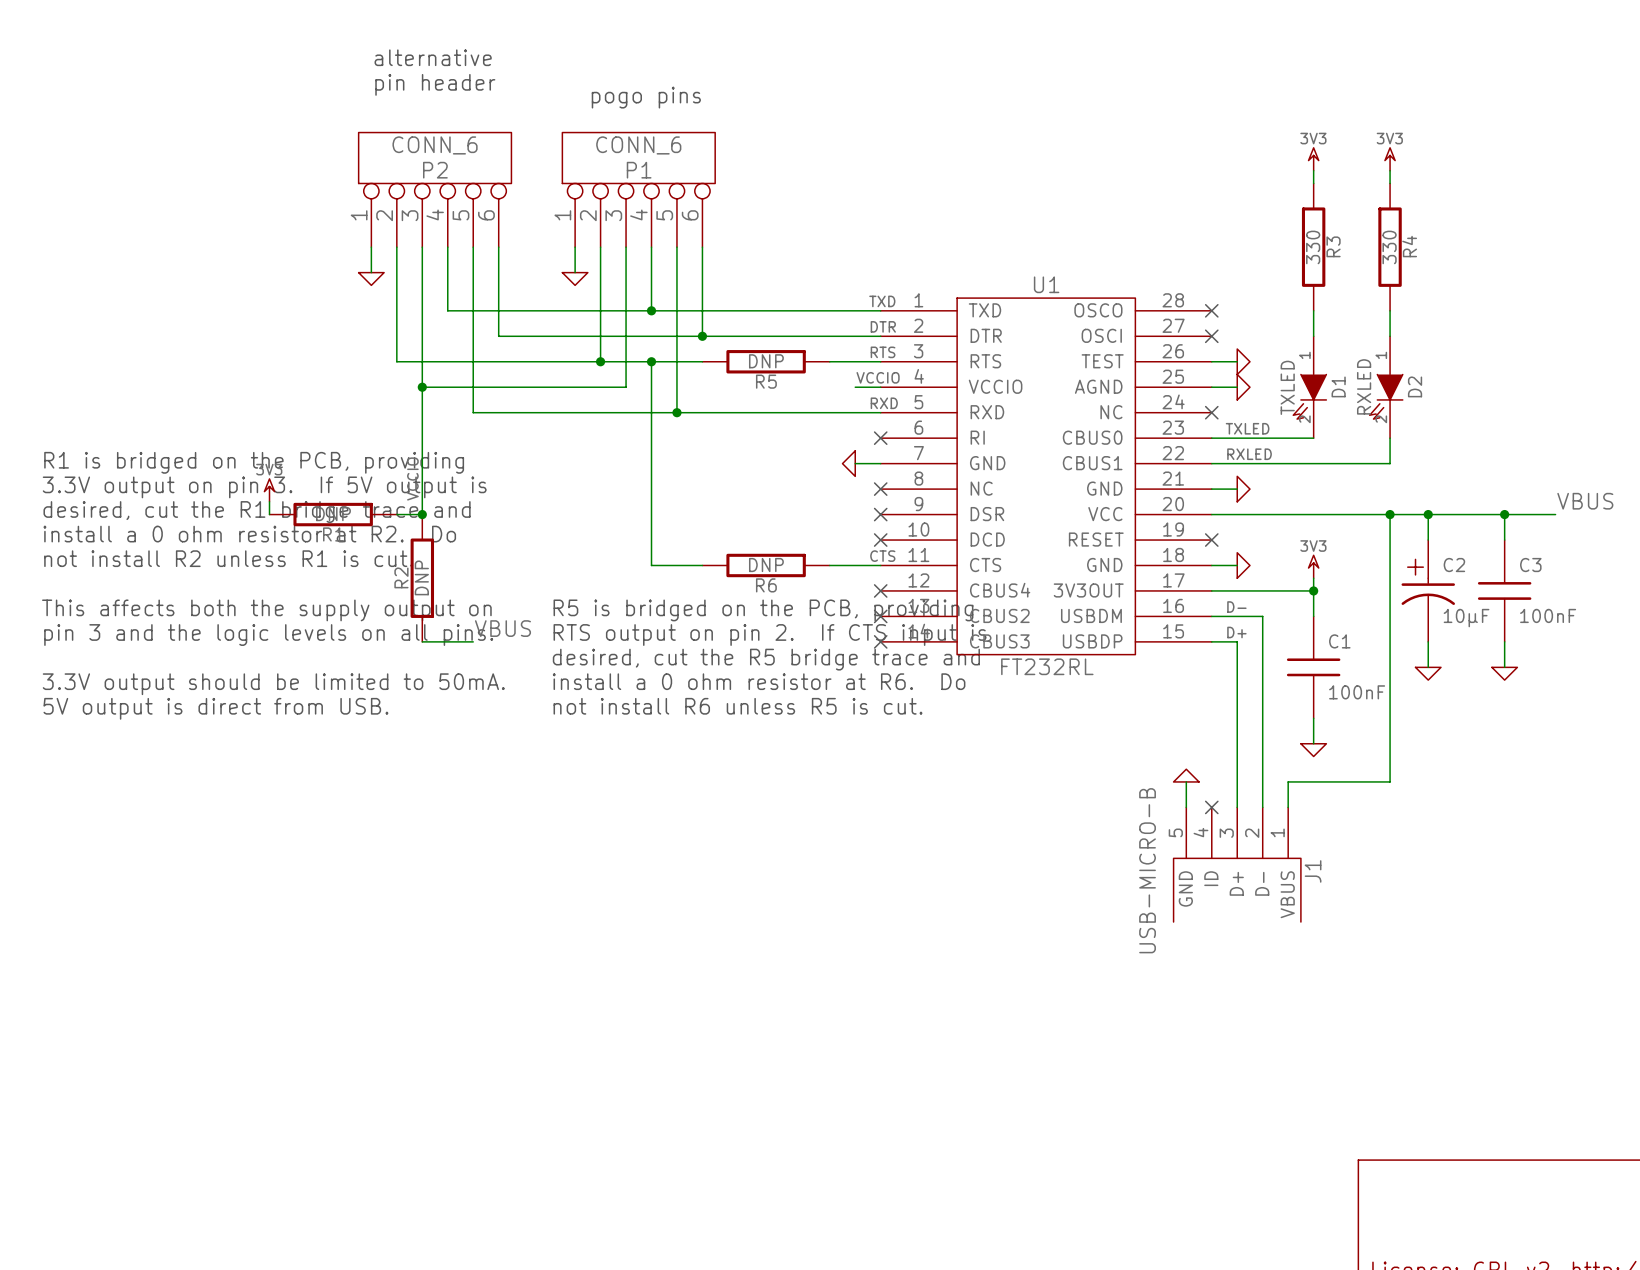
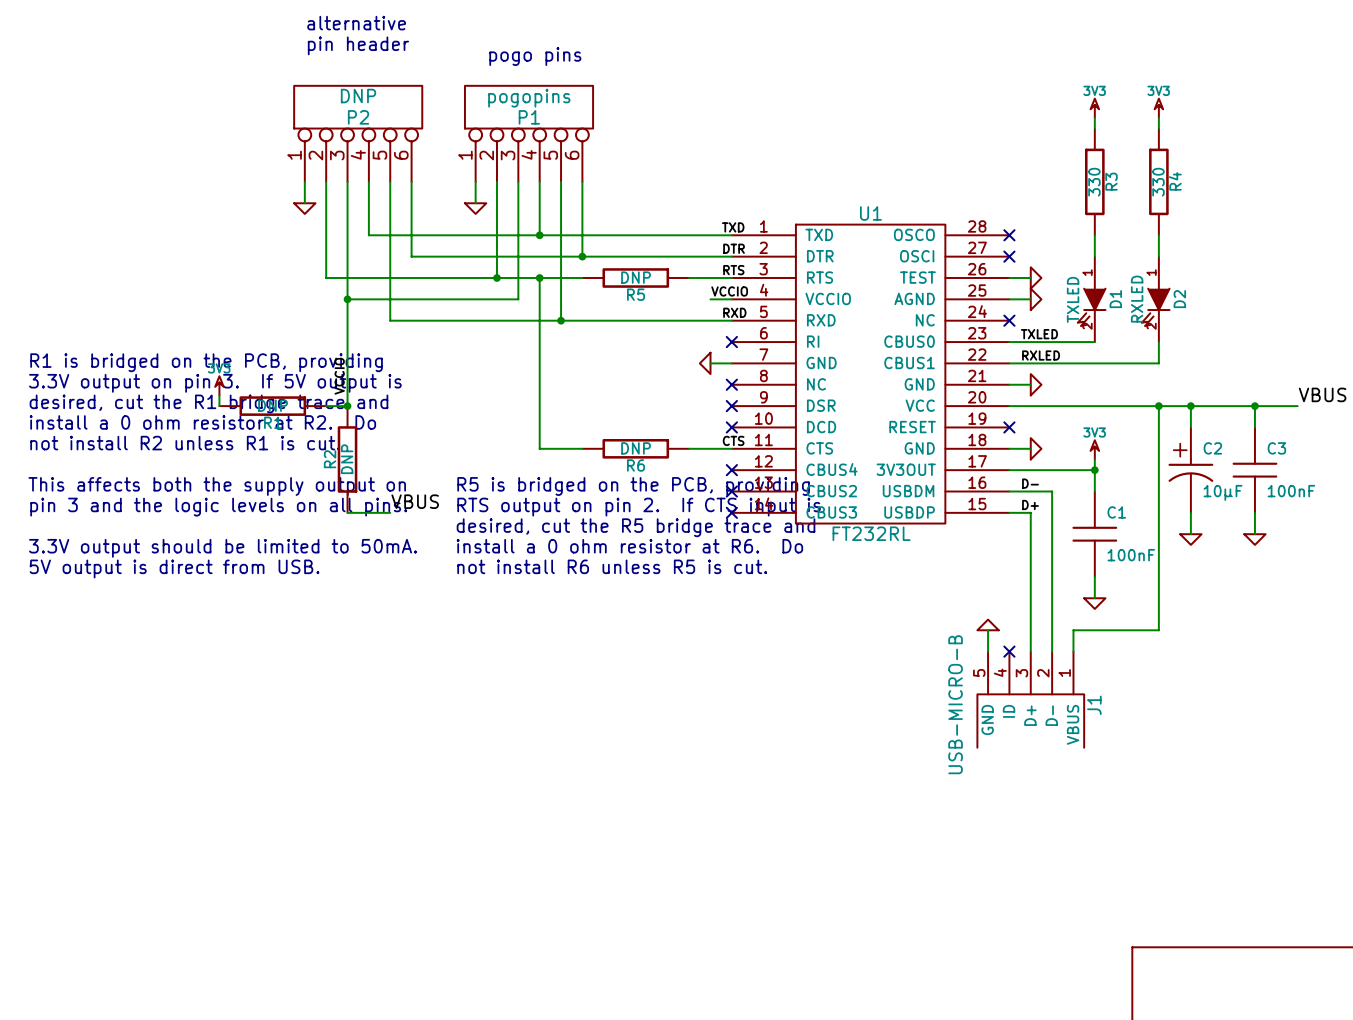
P2 value: CONN_6 (435, 145) -> DNP (358, 96)
P1 value: CONN_6 (638, 145) -> pogopins (529, 98)

